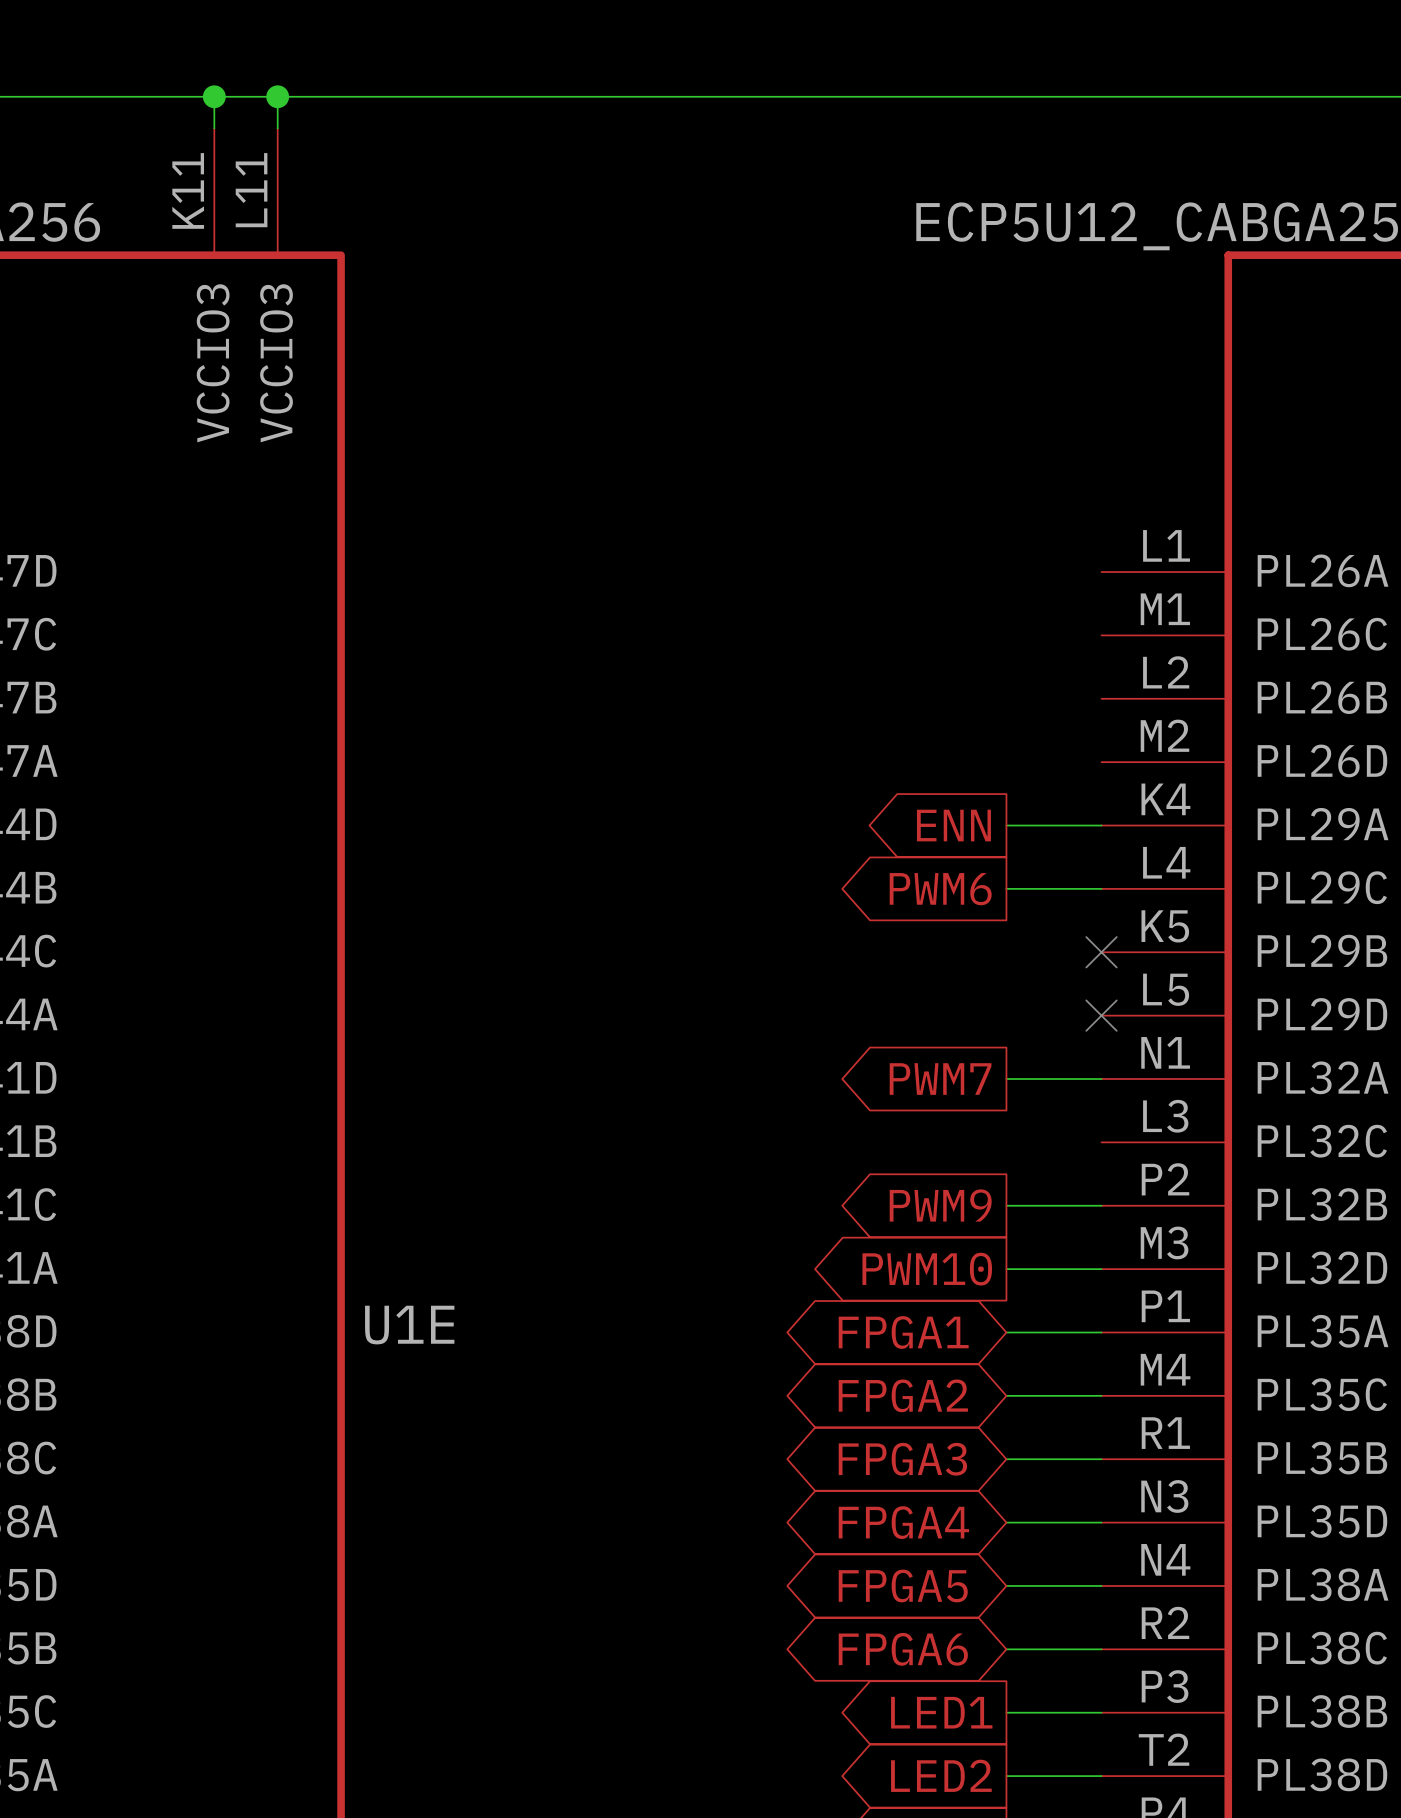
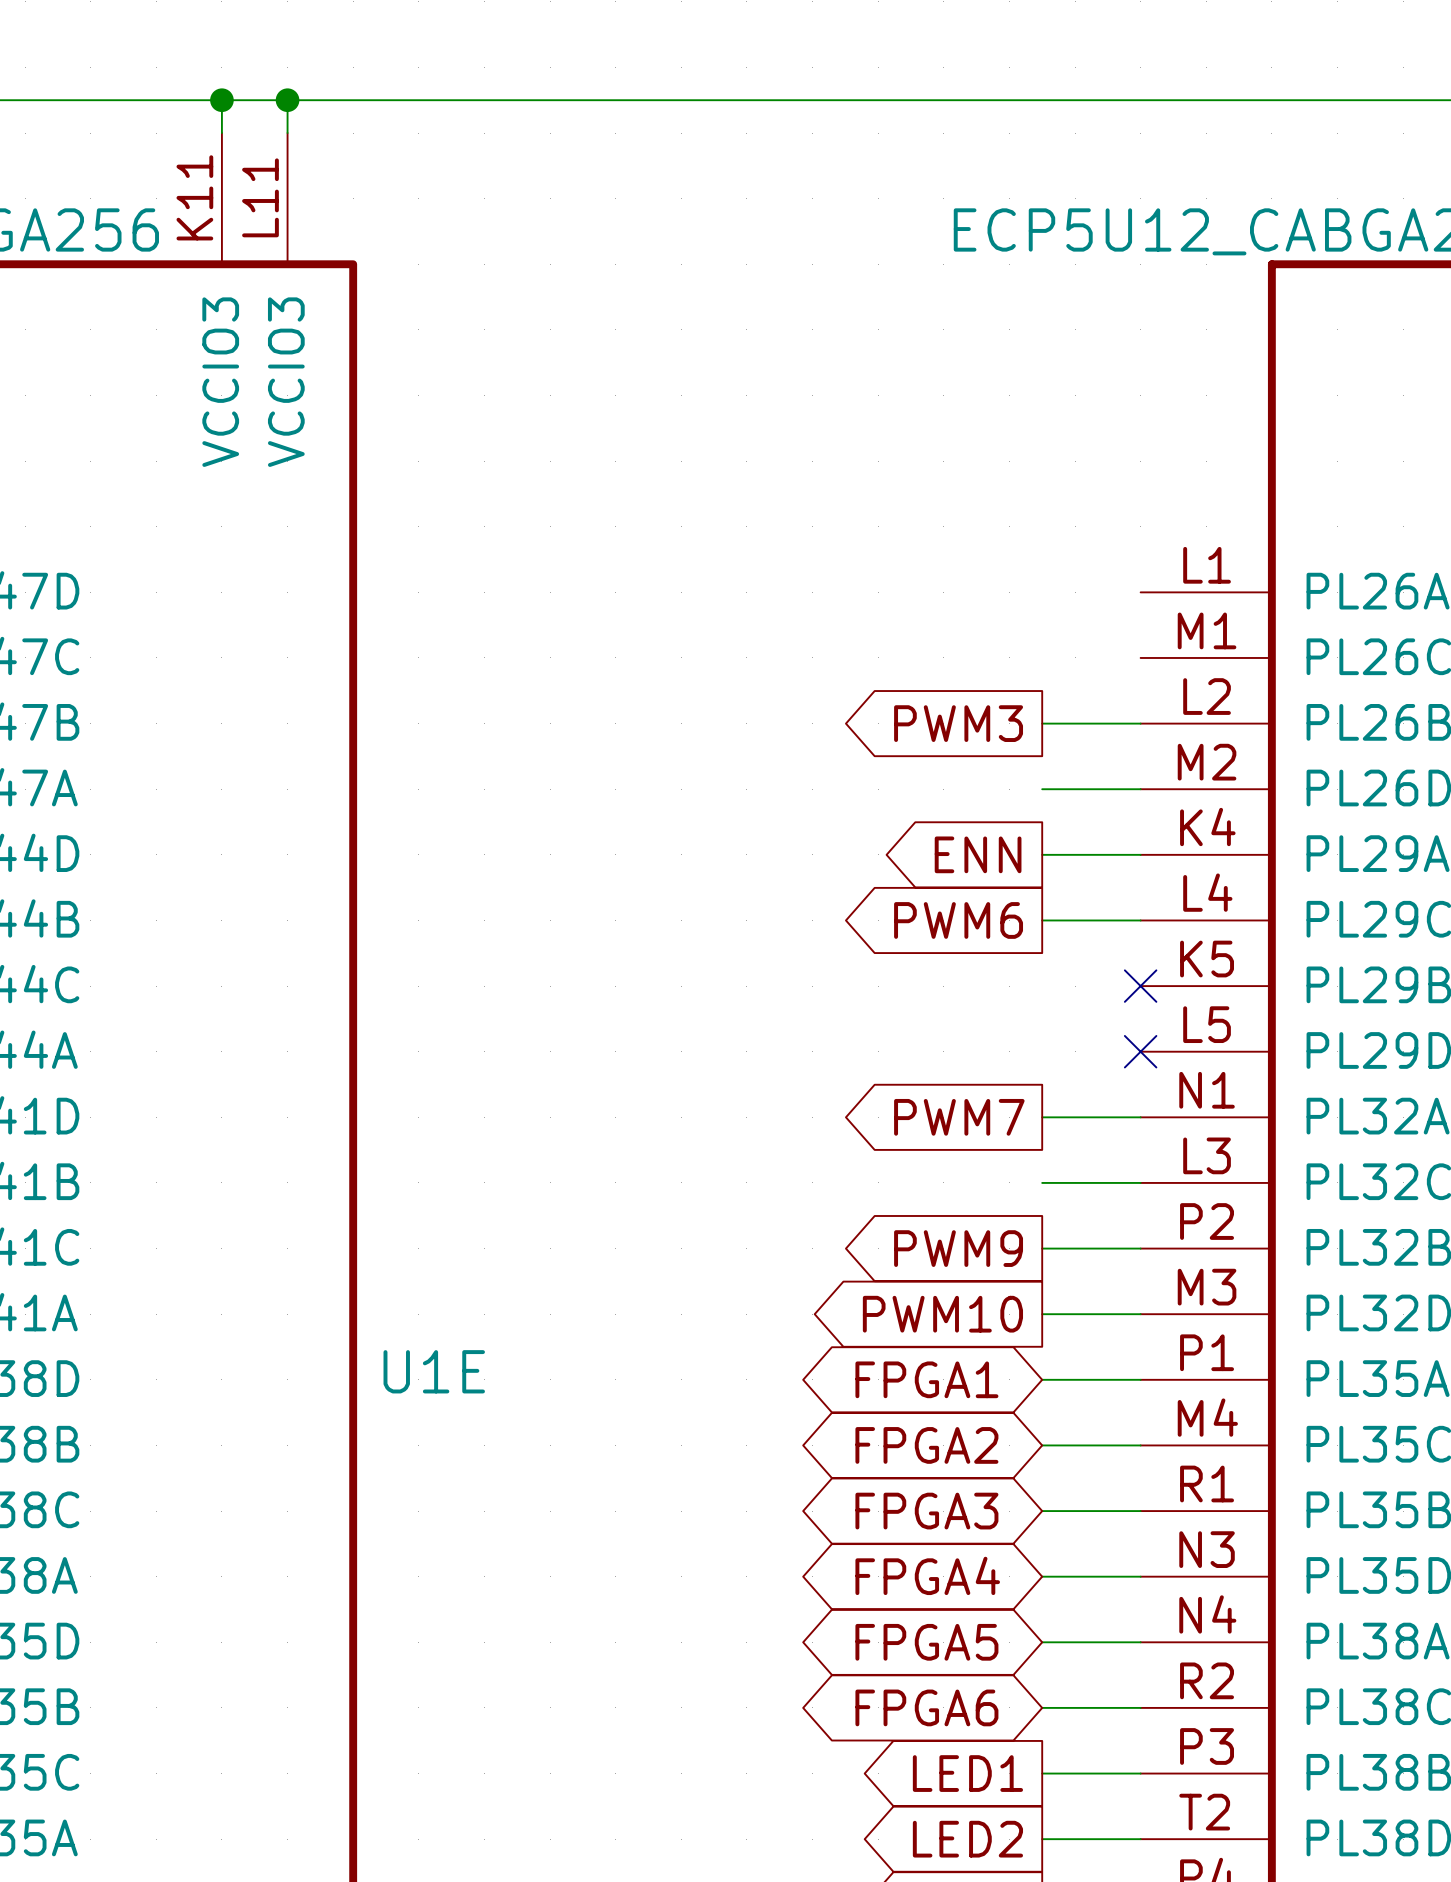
global label: none -> PWM3 (958, 723)
wire: none -> (1042, 723) (1140, 723)
wire: none -> (1042, 789) (1140, 789)
wire: none -> (1042, 1182) (1140, 1182)

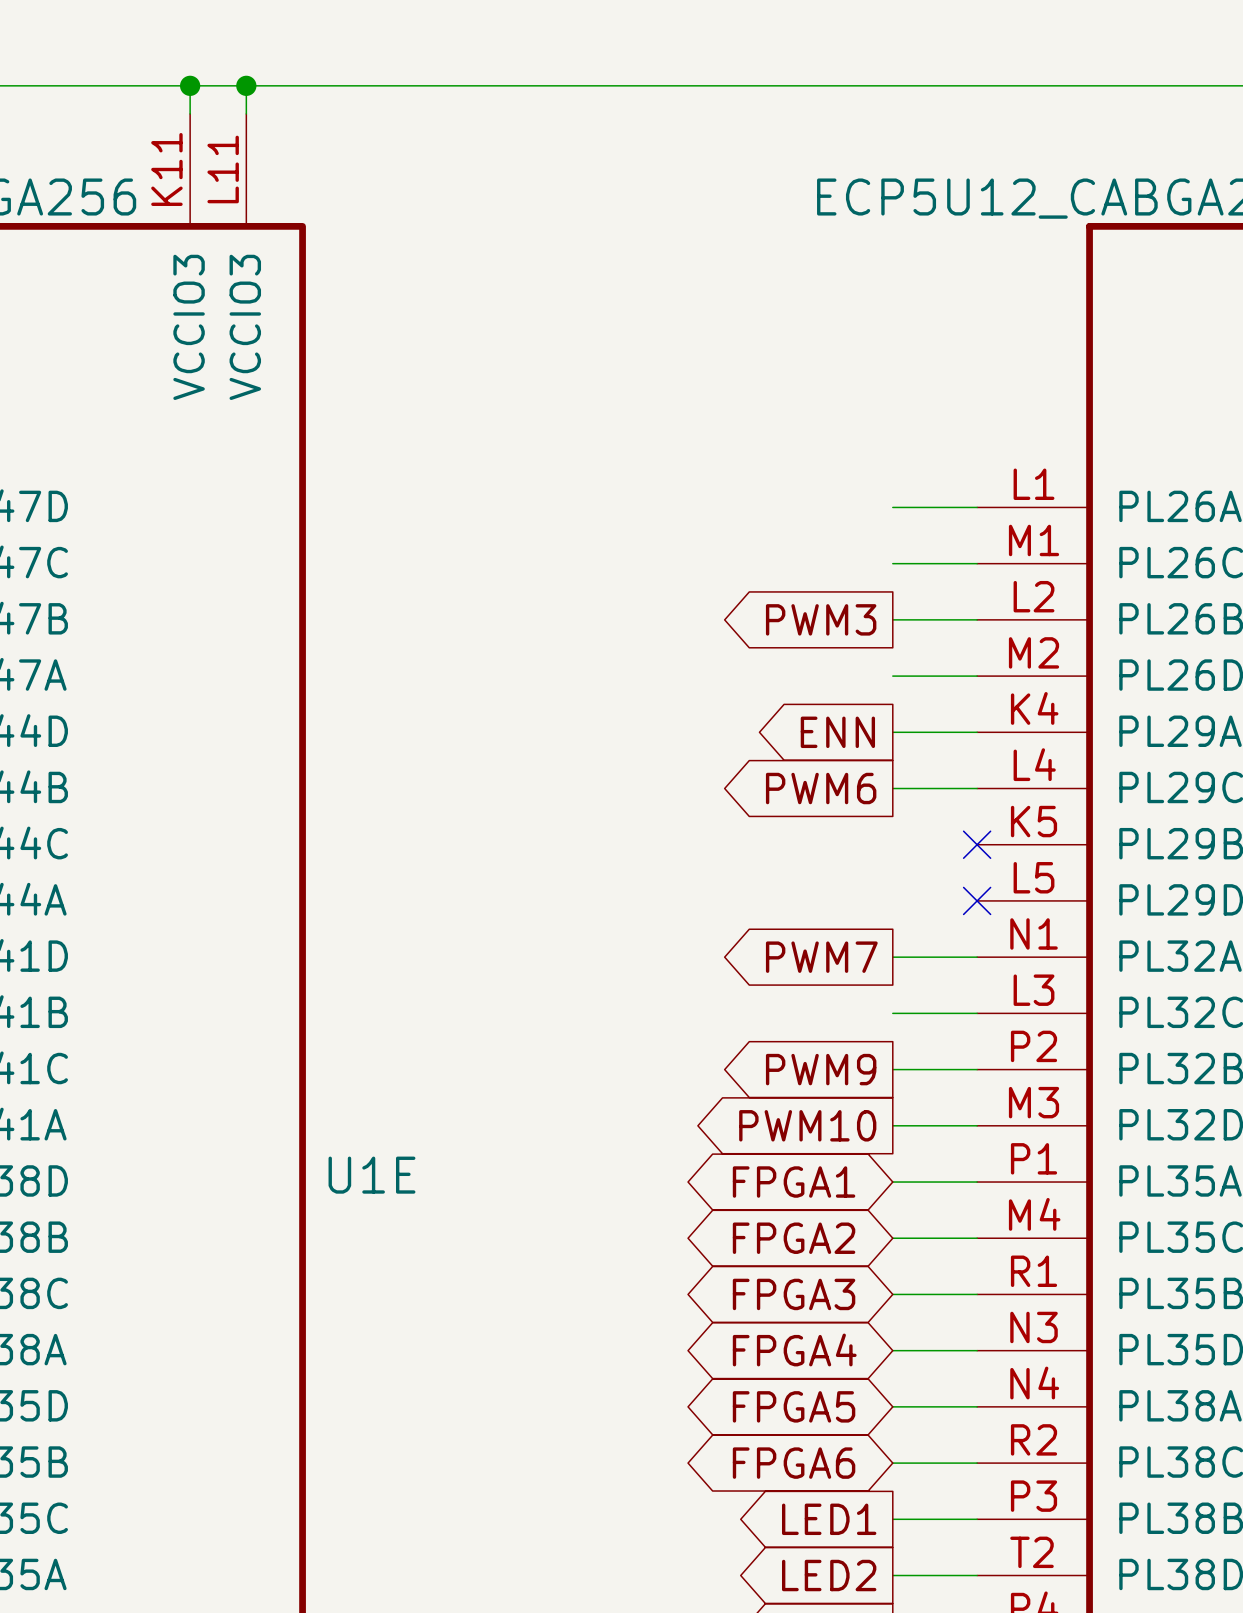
wire: none -> (892, 507) (977, 507)
wire: none -> (892, 563) (977, 563)

